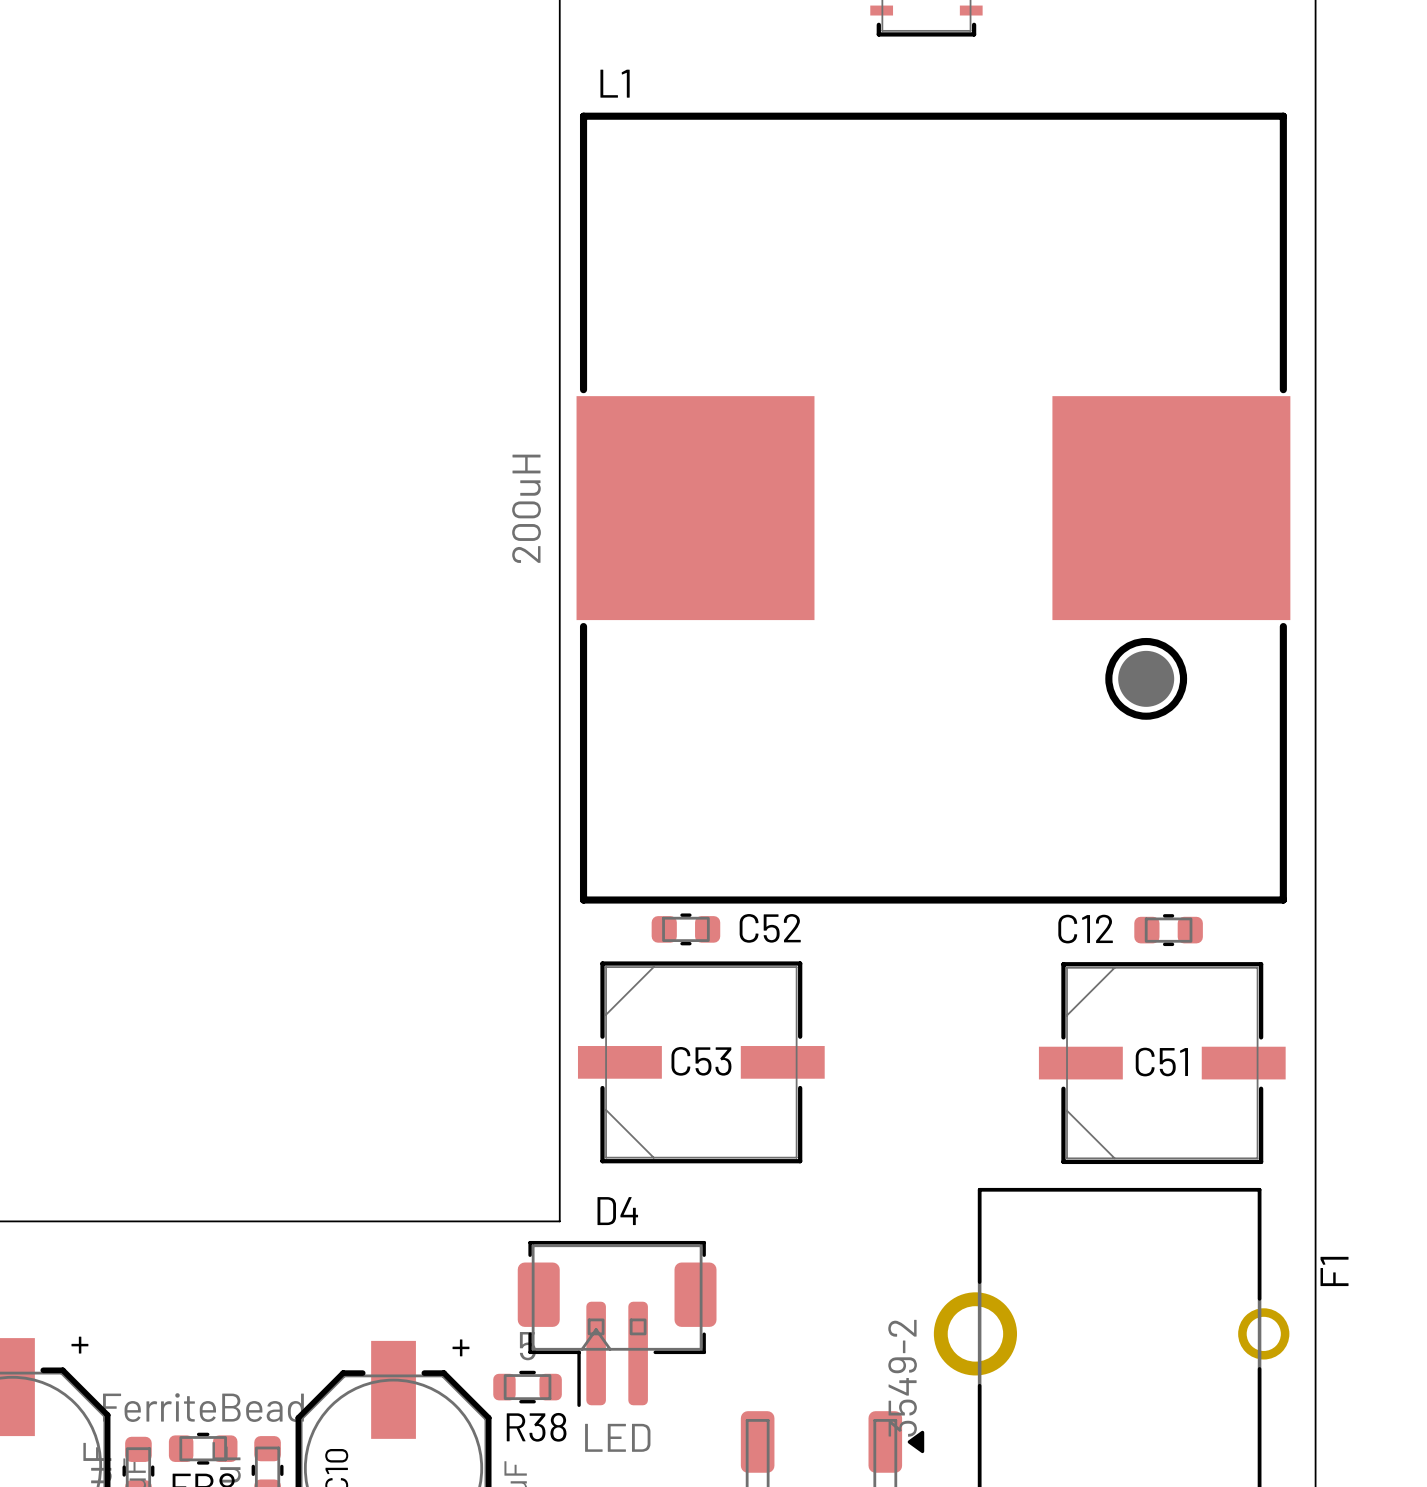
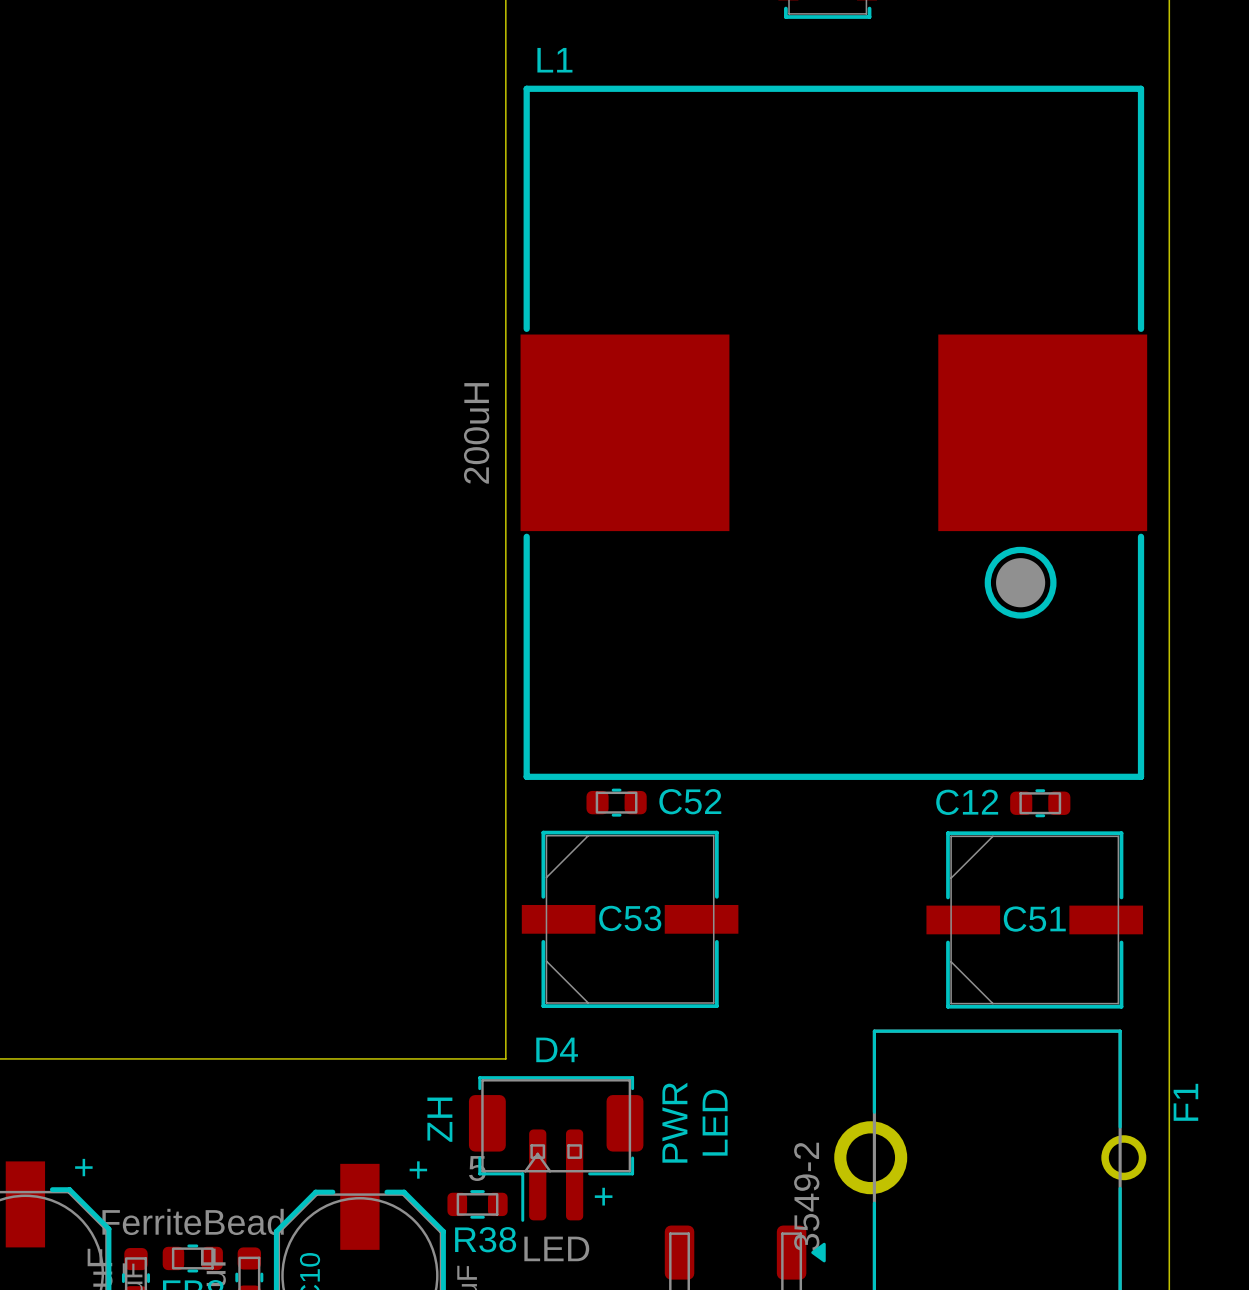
text: none -> ZH (439, 1119)
text: none -> PWR (674, 1122)
text: none -> LED (715, 1122)
text: none -> + (603, 1196)

